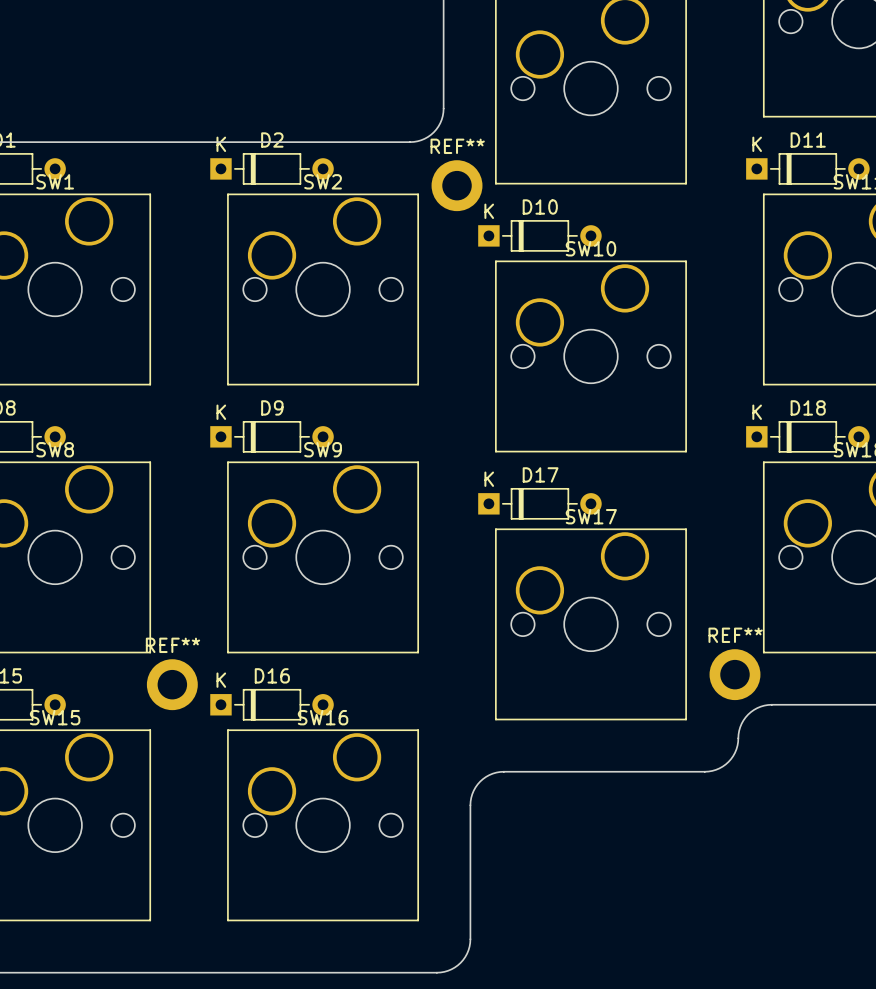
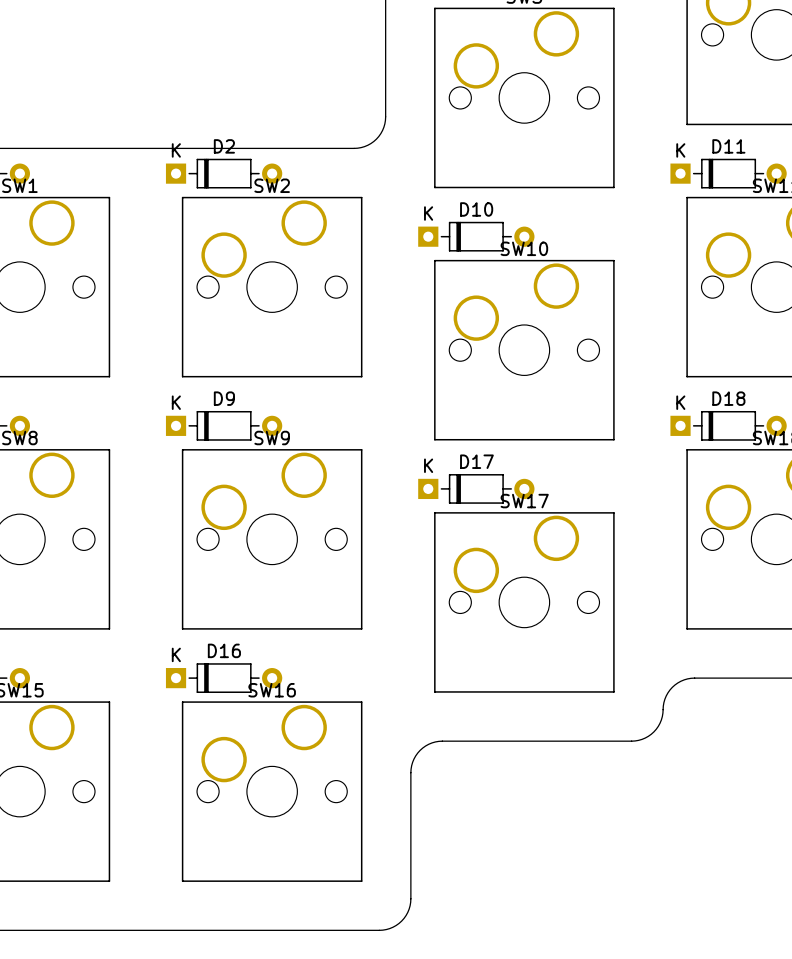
REF**: (457, 185) -> none
REF**: (734, 674) -> none
REF**: (172, 684) -> none

